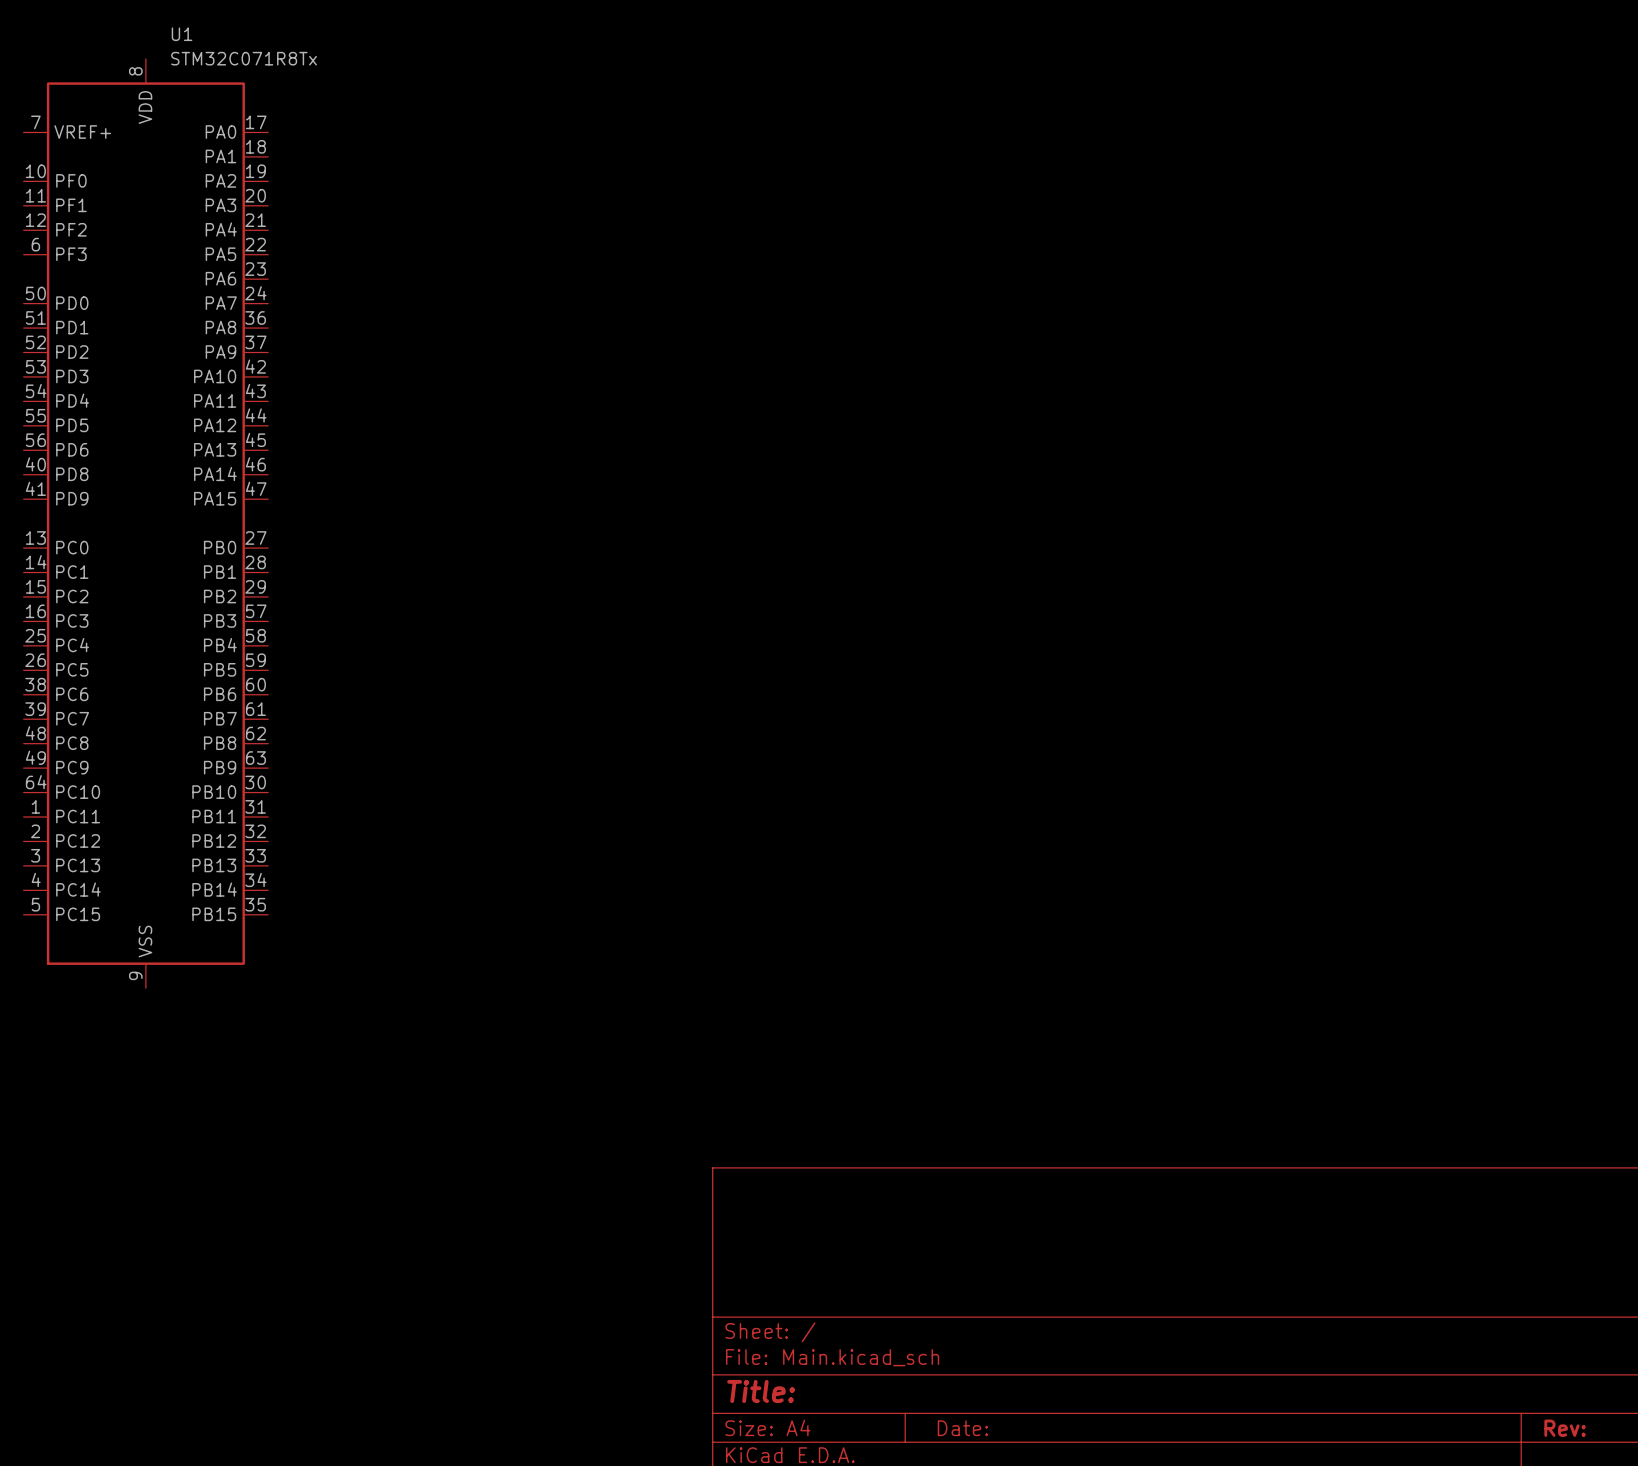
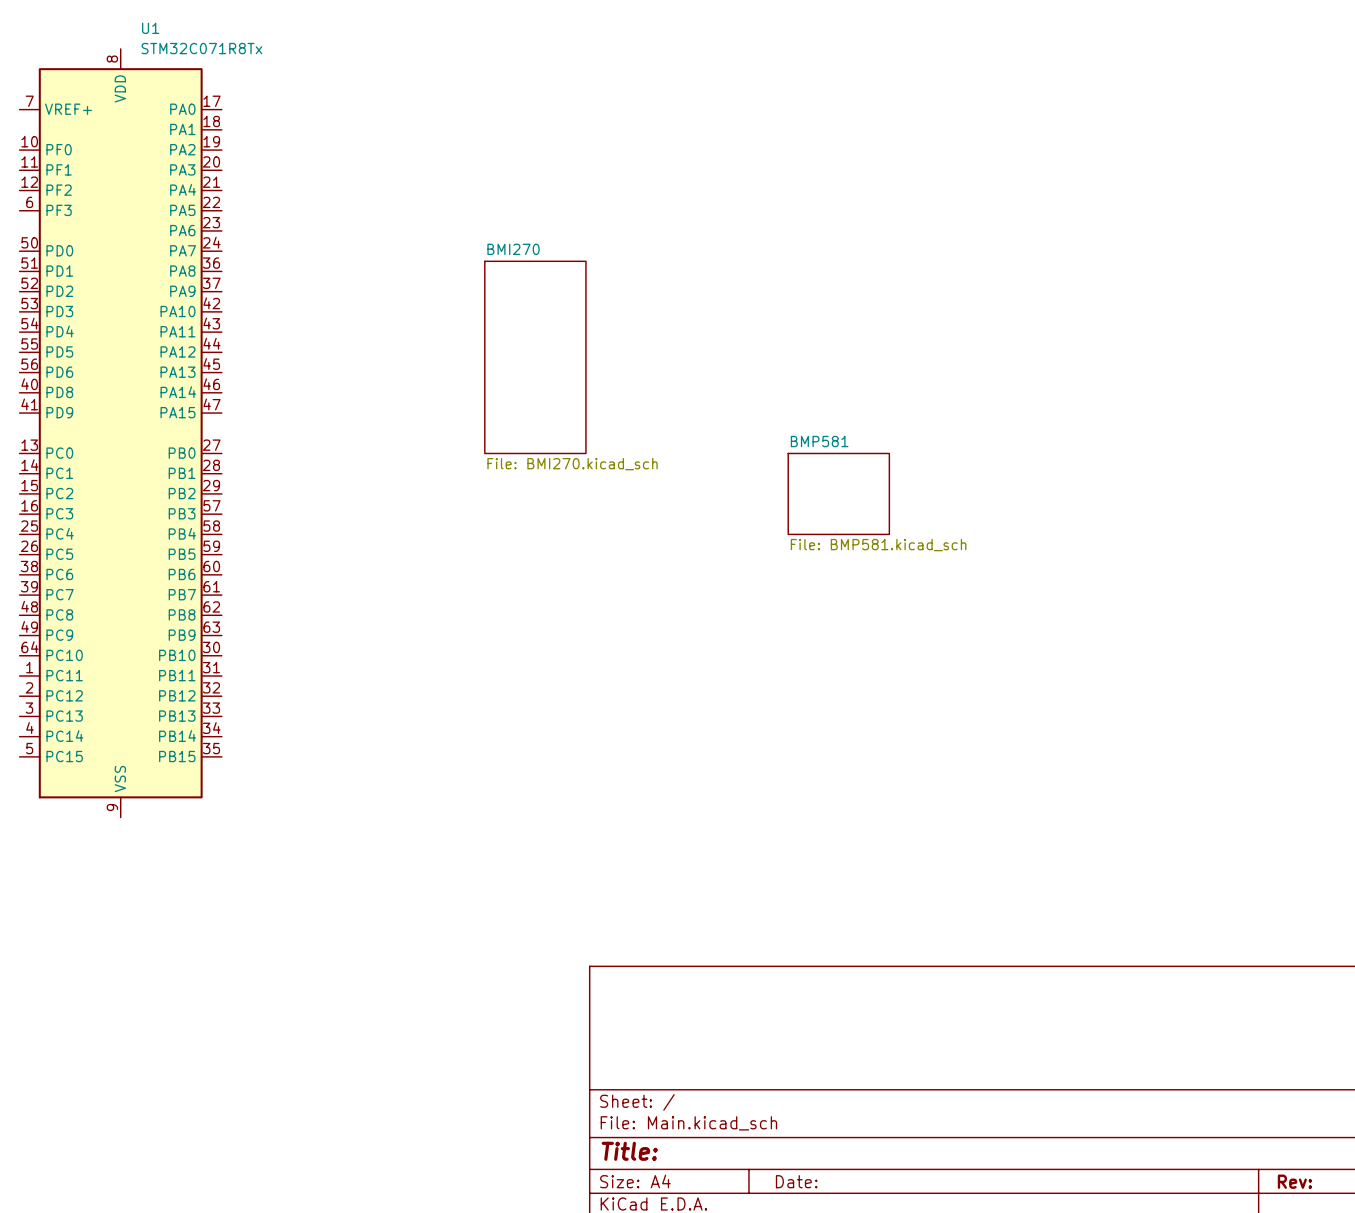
sheet BMI270: none -> File: BMI270.kicad_sch (535, 357)
sheet BMP581: none -> File: BMP581.kicad_sch (838, 493)

